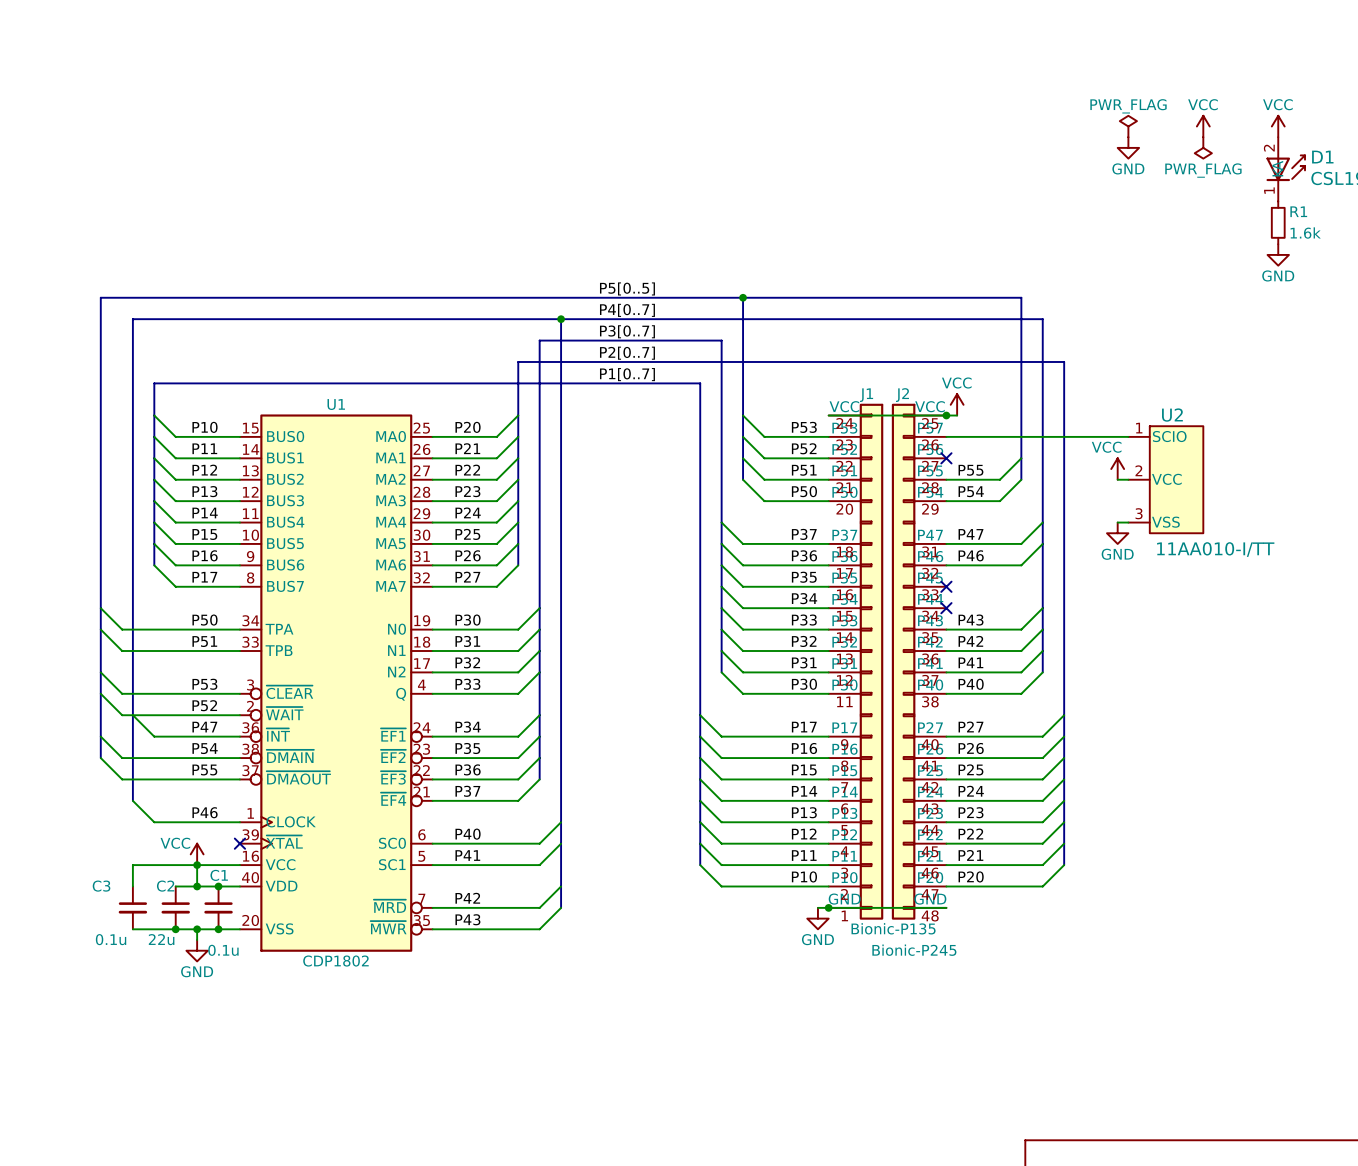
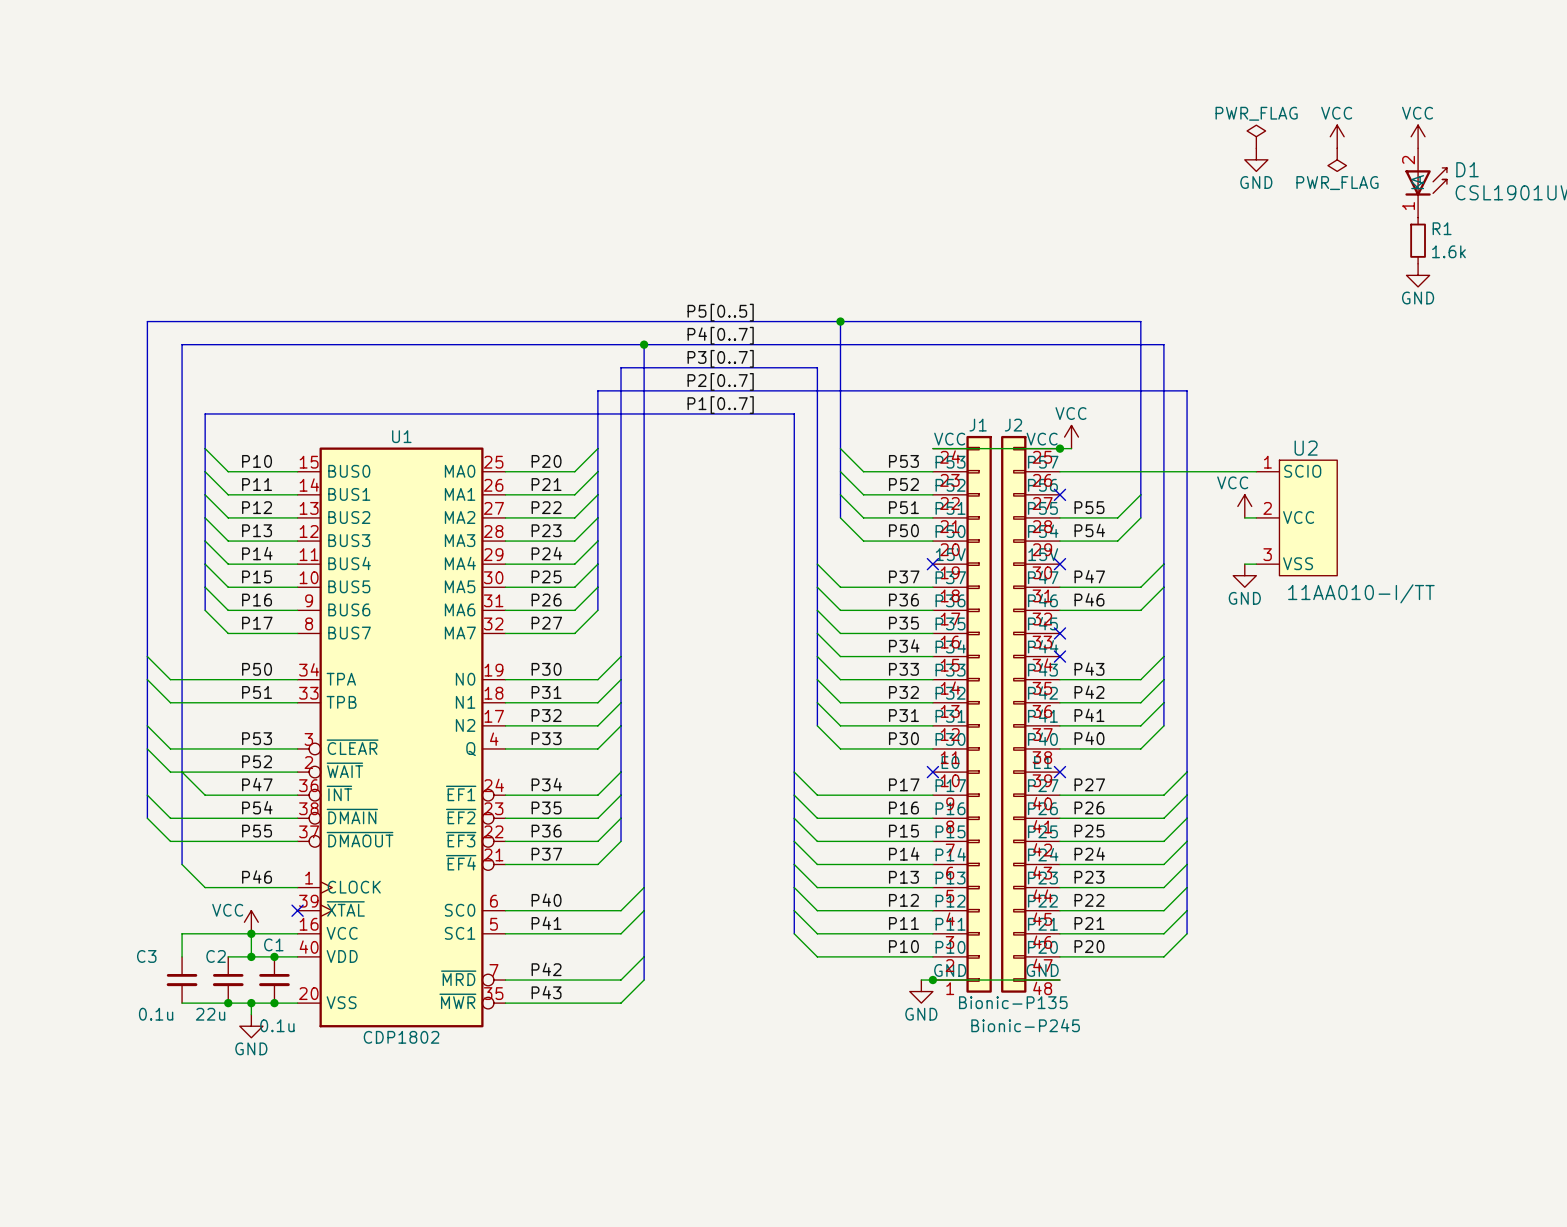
J1 symbol: [828, 403, 884, 920] -> [932, 435, 992, 993]
J2 symbol: [891, 403, 947, 920] -> [1001, 435, 1060, 993]
no-connect mark: none -> (932, 564)
no-connect mark: none -> (1059, 564)
no-connect mark: none -> (932, 772)
no-connect mark: none -> (1059, 772)

